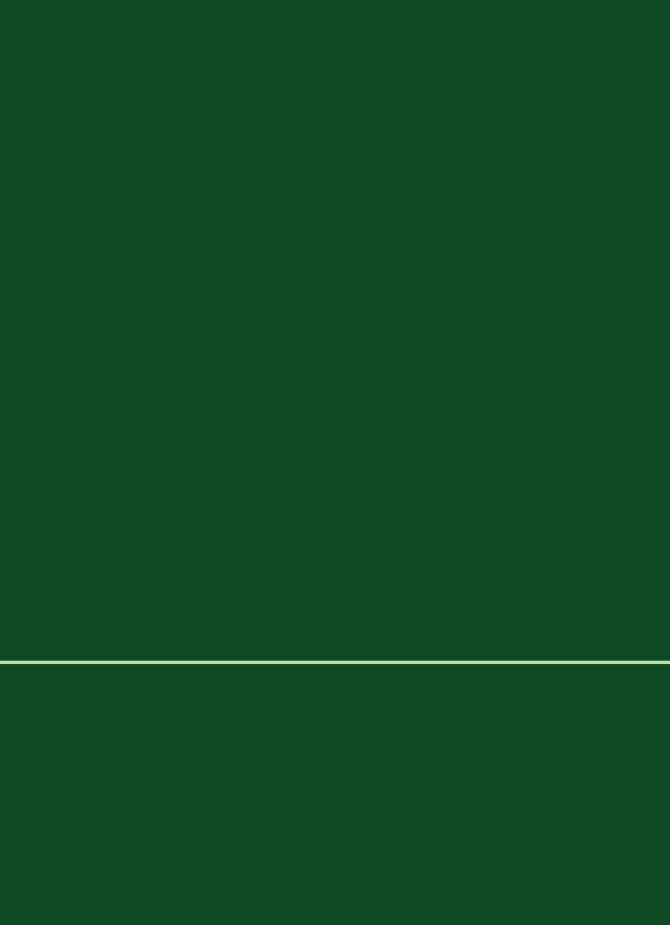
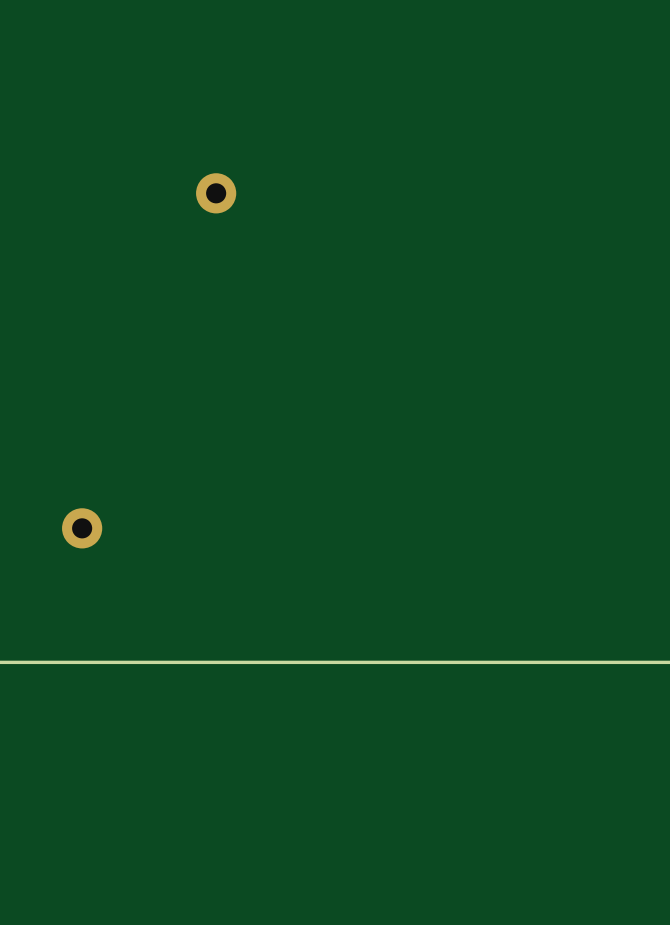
via: none -> (216, 193)
via: none -> (82, 528)

